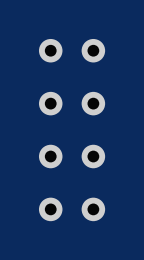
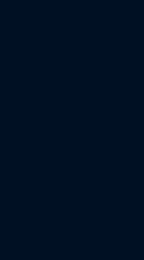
part: (72, 50) -> none
part: (72, 103) -> none
part: (72, 156) -> none
part: (72, 209) -> none

